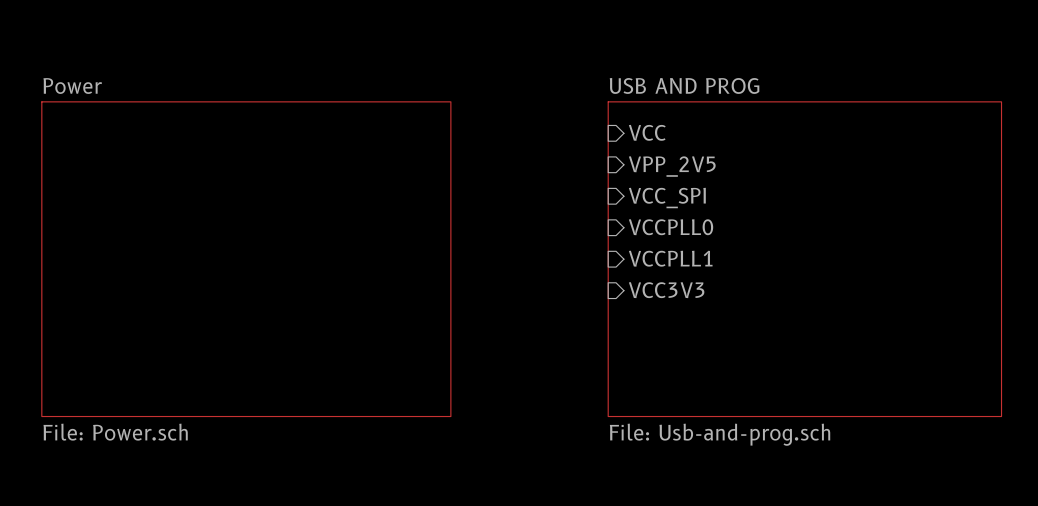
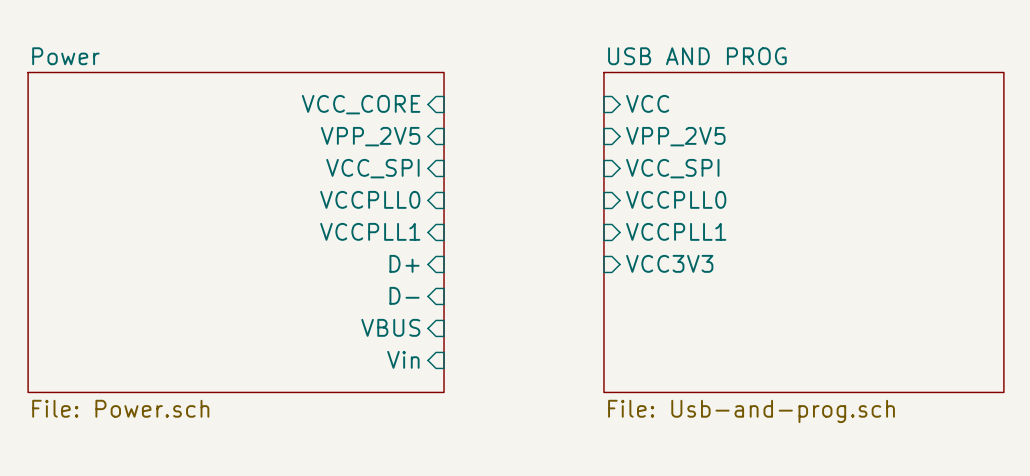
sheet pin: none -> VCC_CORE (361, 104)
sheet pin: none -> VPP_2V5 (370, 136)
sheet pin: none -> VCC_SPI (372, 168)
sheet pin: none -> VCCPLL0 (370, 199)
sheet pin: none -> VCCPLL1 (370, 231)
sheet pin: none -> D+ (404, 263)
sheet pin: none -> D- (404, 295)
sheet pin: none -> VBUS (390, 327)
sheet pin: none -> Vin (403, 359)

